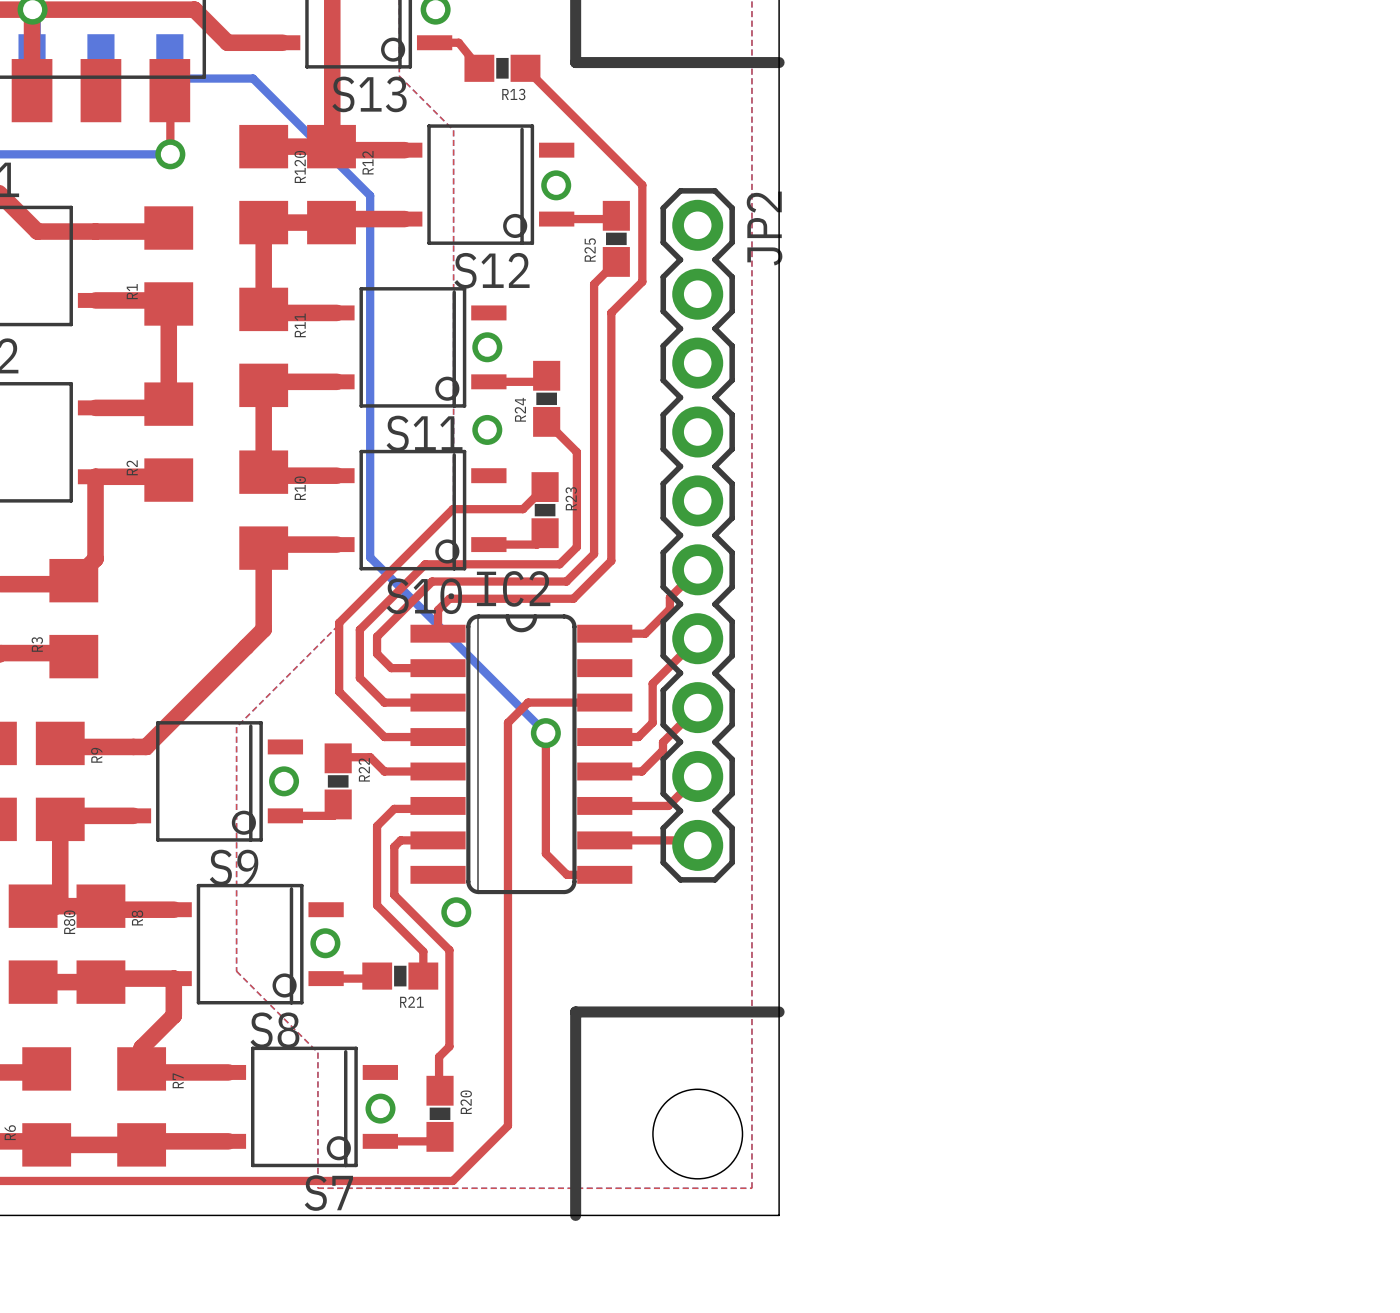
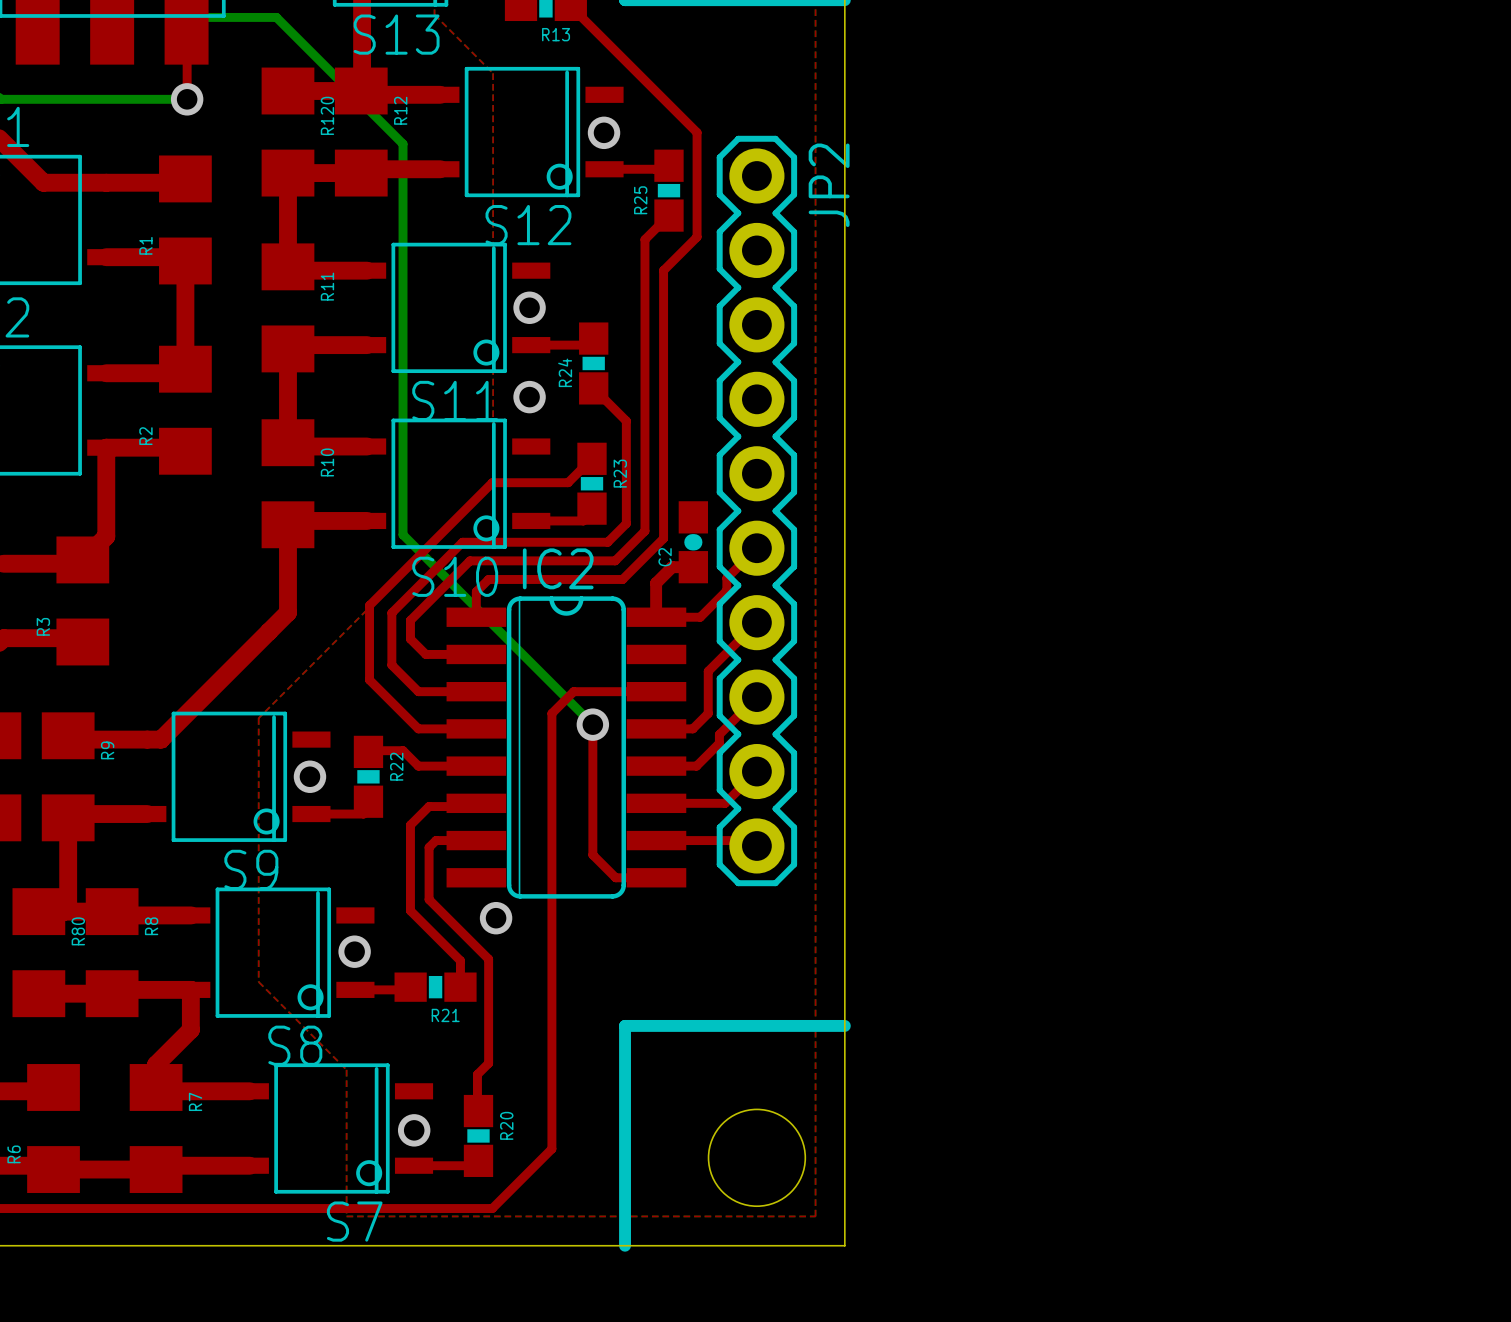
C2: none -> (693, 542)
top track: none -> (693, 567) (672, 567) (656, 583) (656, 616)

